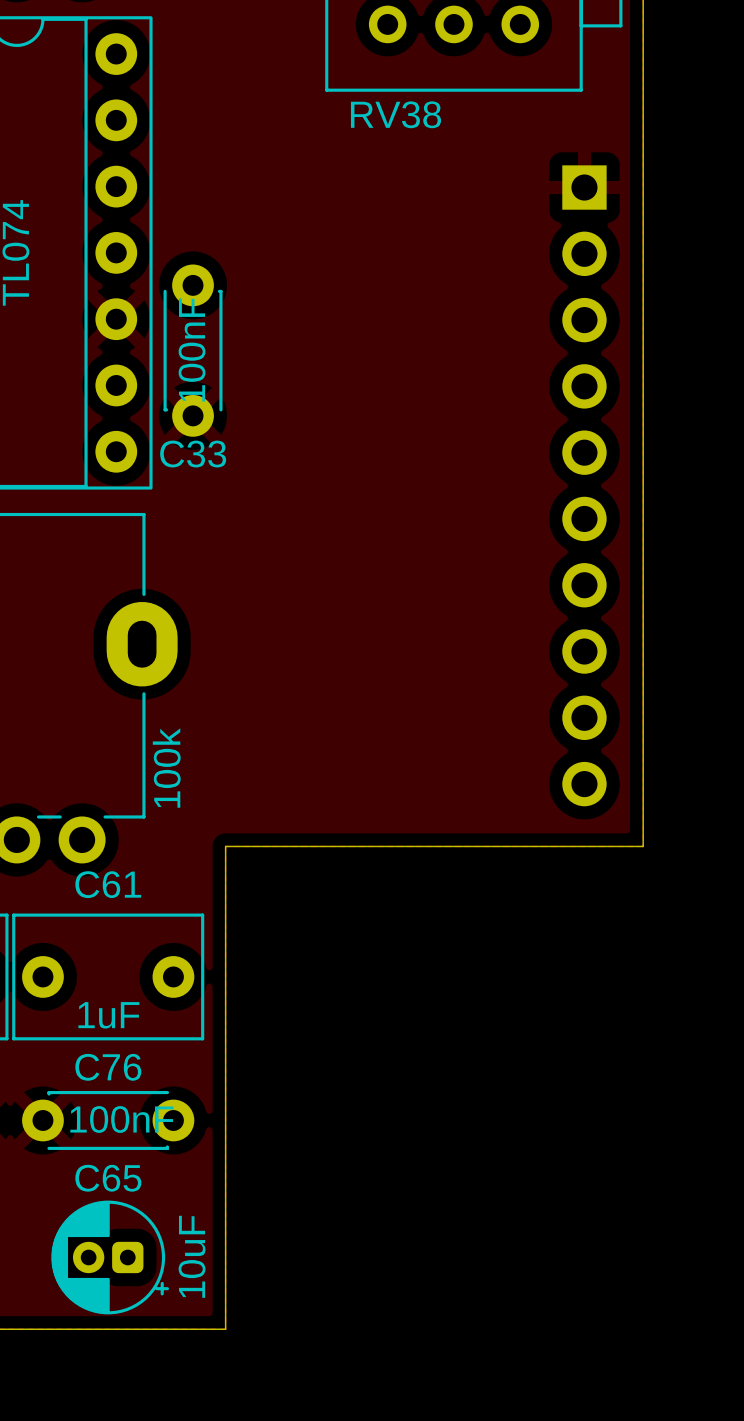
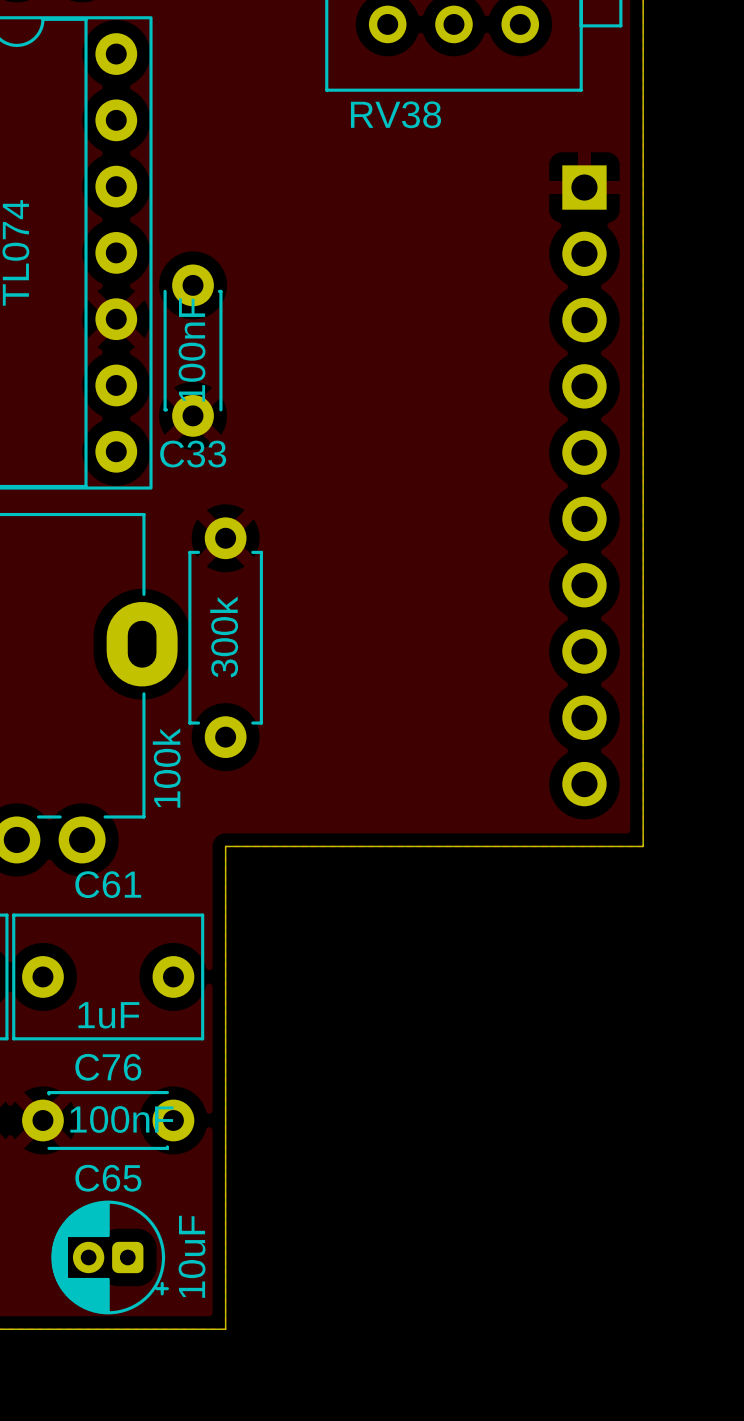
part: none -> 300k (225, 637)

